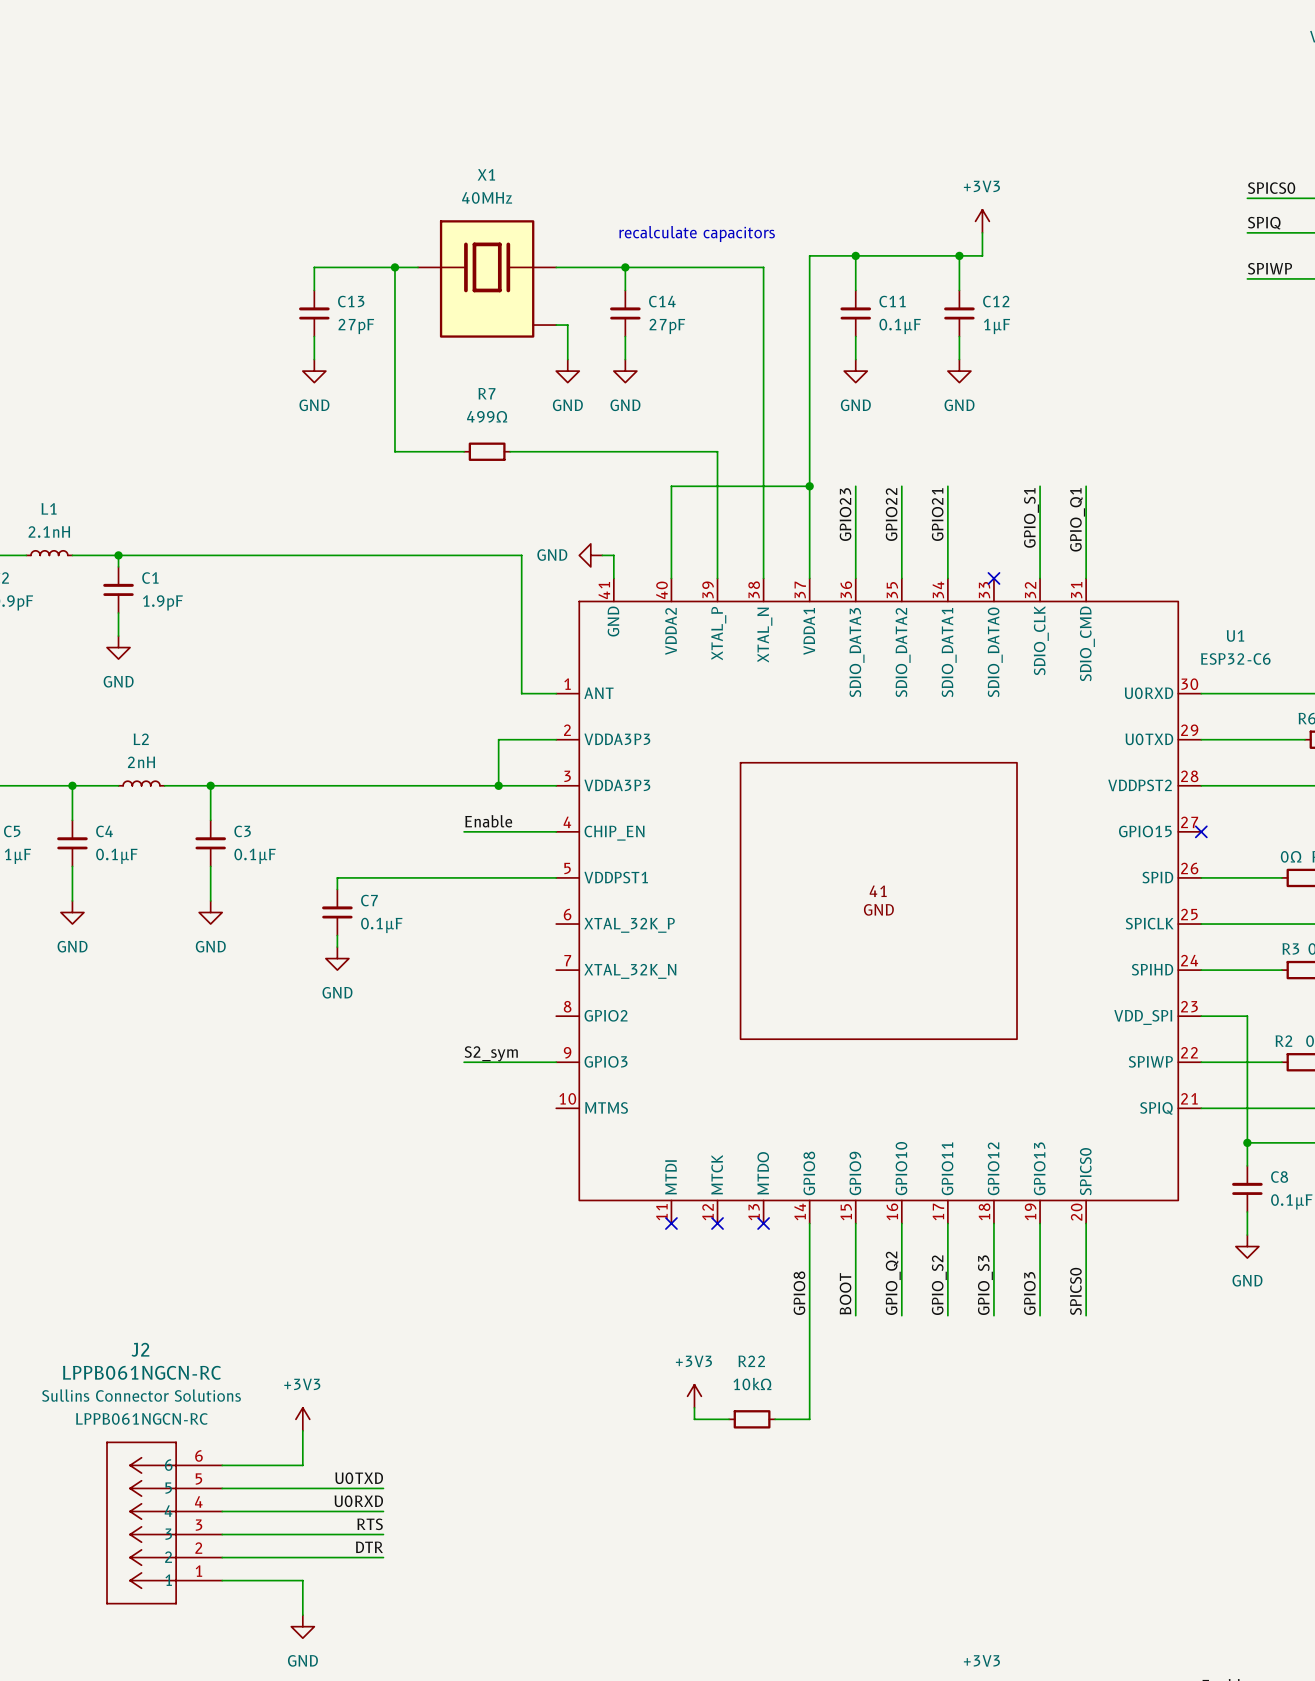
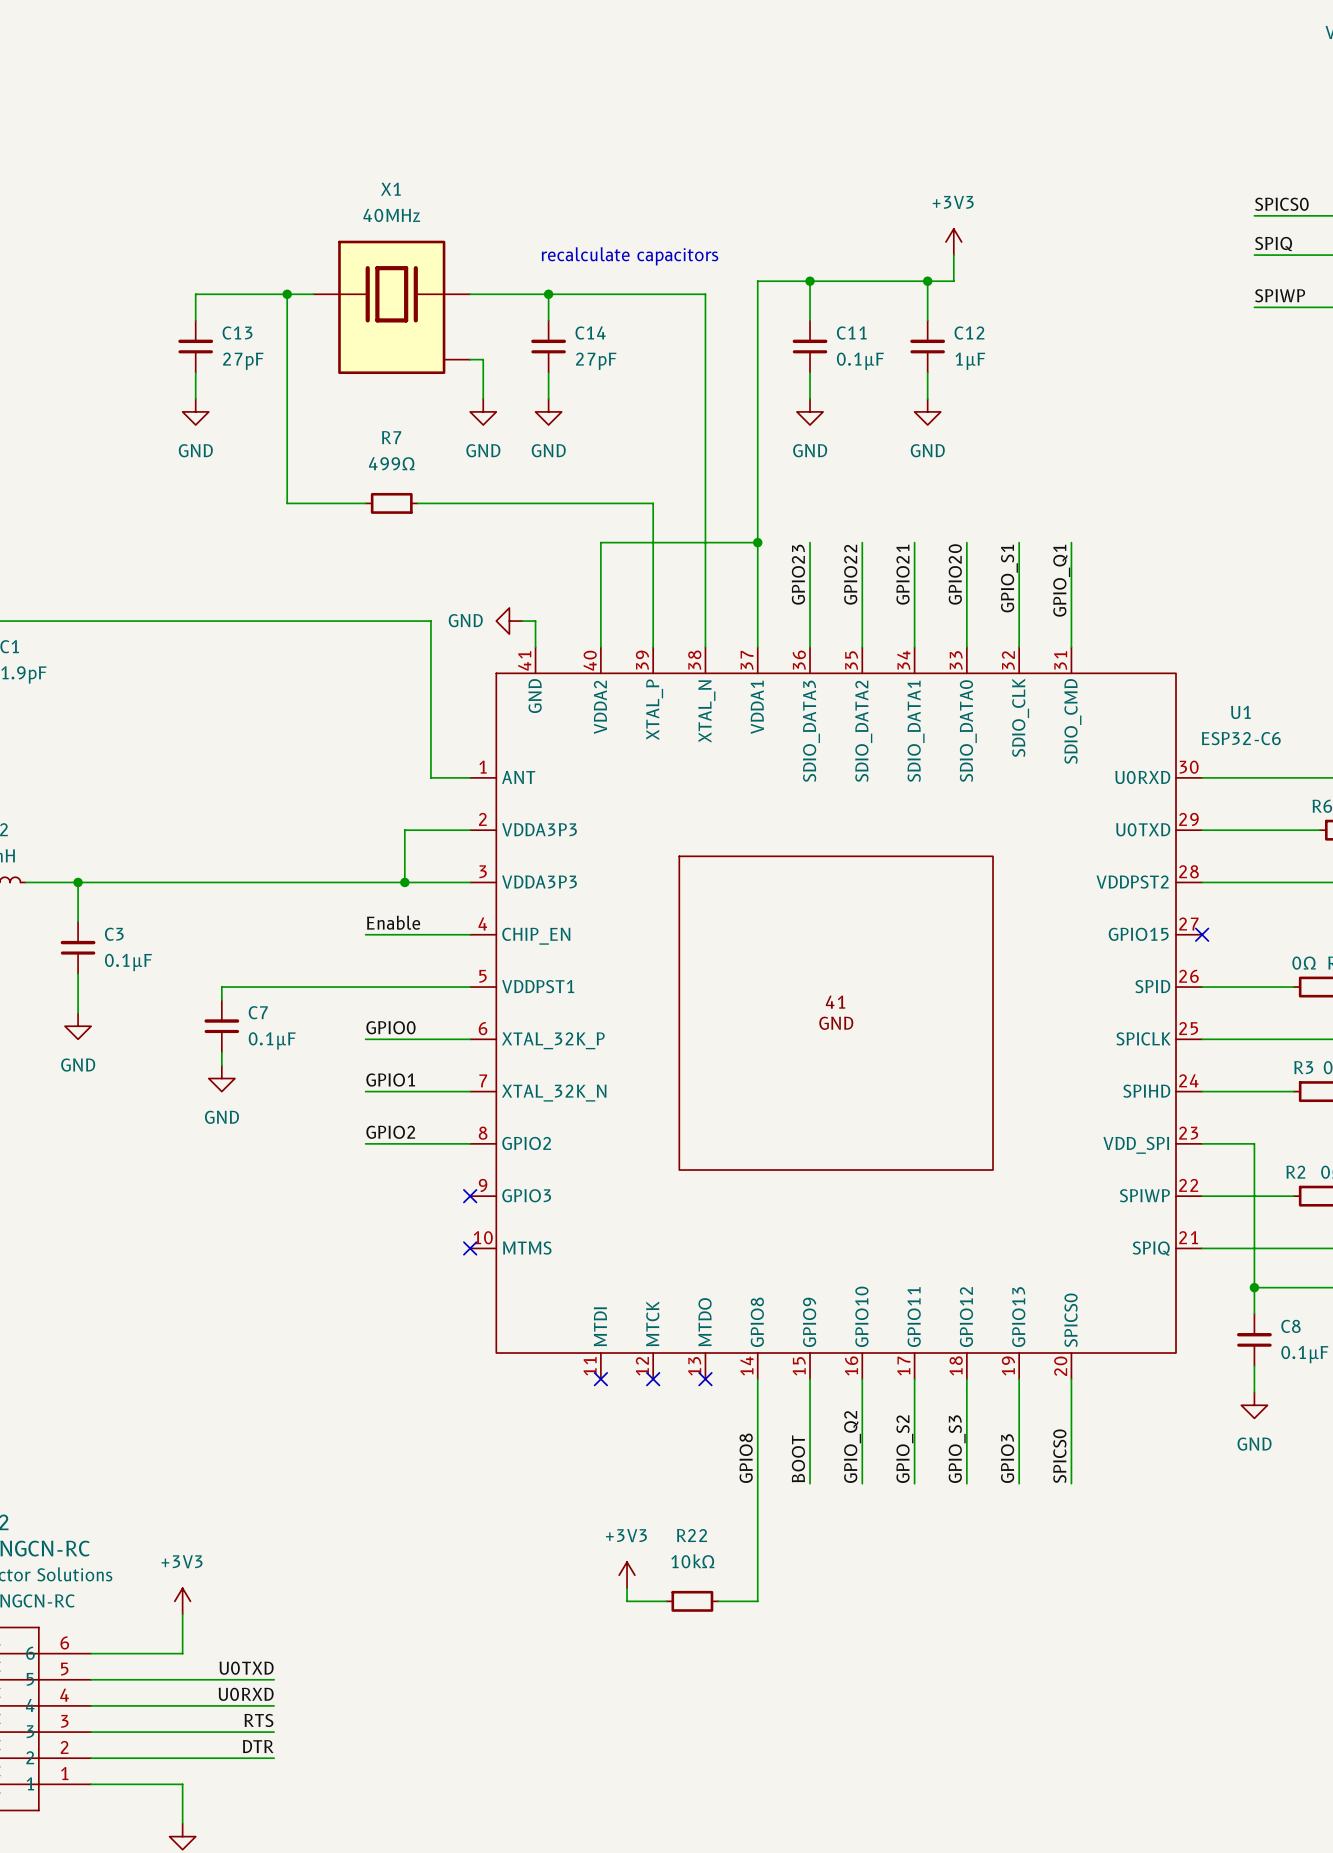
wire: none -> (966, 542) (966, 647)
label: none -> GPIO20 (955, 574)
no-connect mark: (993, 578) -> none
label: none -> GPIO0 (390, 1027)
wire: none -> (365, 1039) (470, 1039)
label: none -> GPIO1 (390, 1080)
wire: none -> (365, 1091) (470, 1091)
label: none -> GPIO2 (390, 1132)
label: S2_sym (491, 1053) -> none
wire: (464, 1062) (556, 1062) -> (365, 1143) (470, 1143)
no-connect mark: none -> (470, 1196)
no-connect mark: none -> (470, 1248)

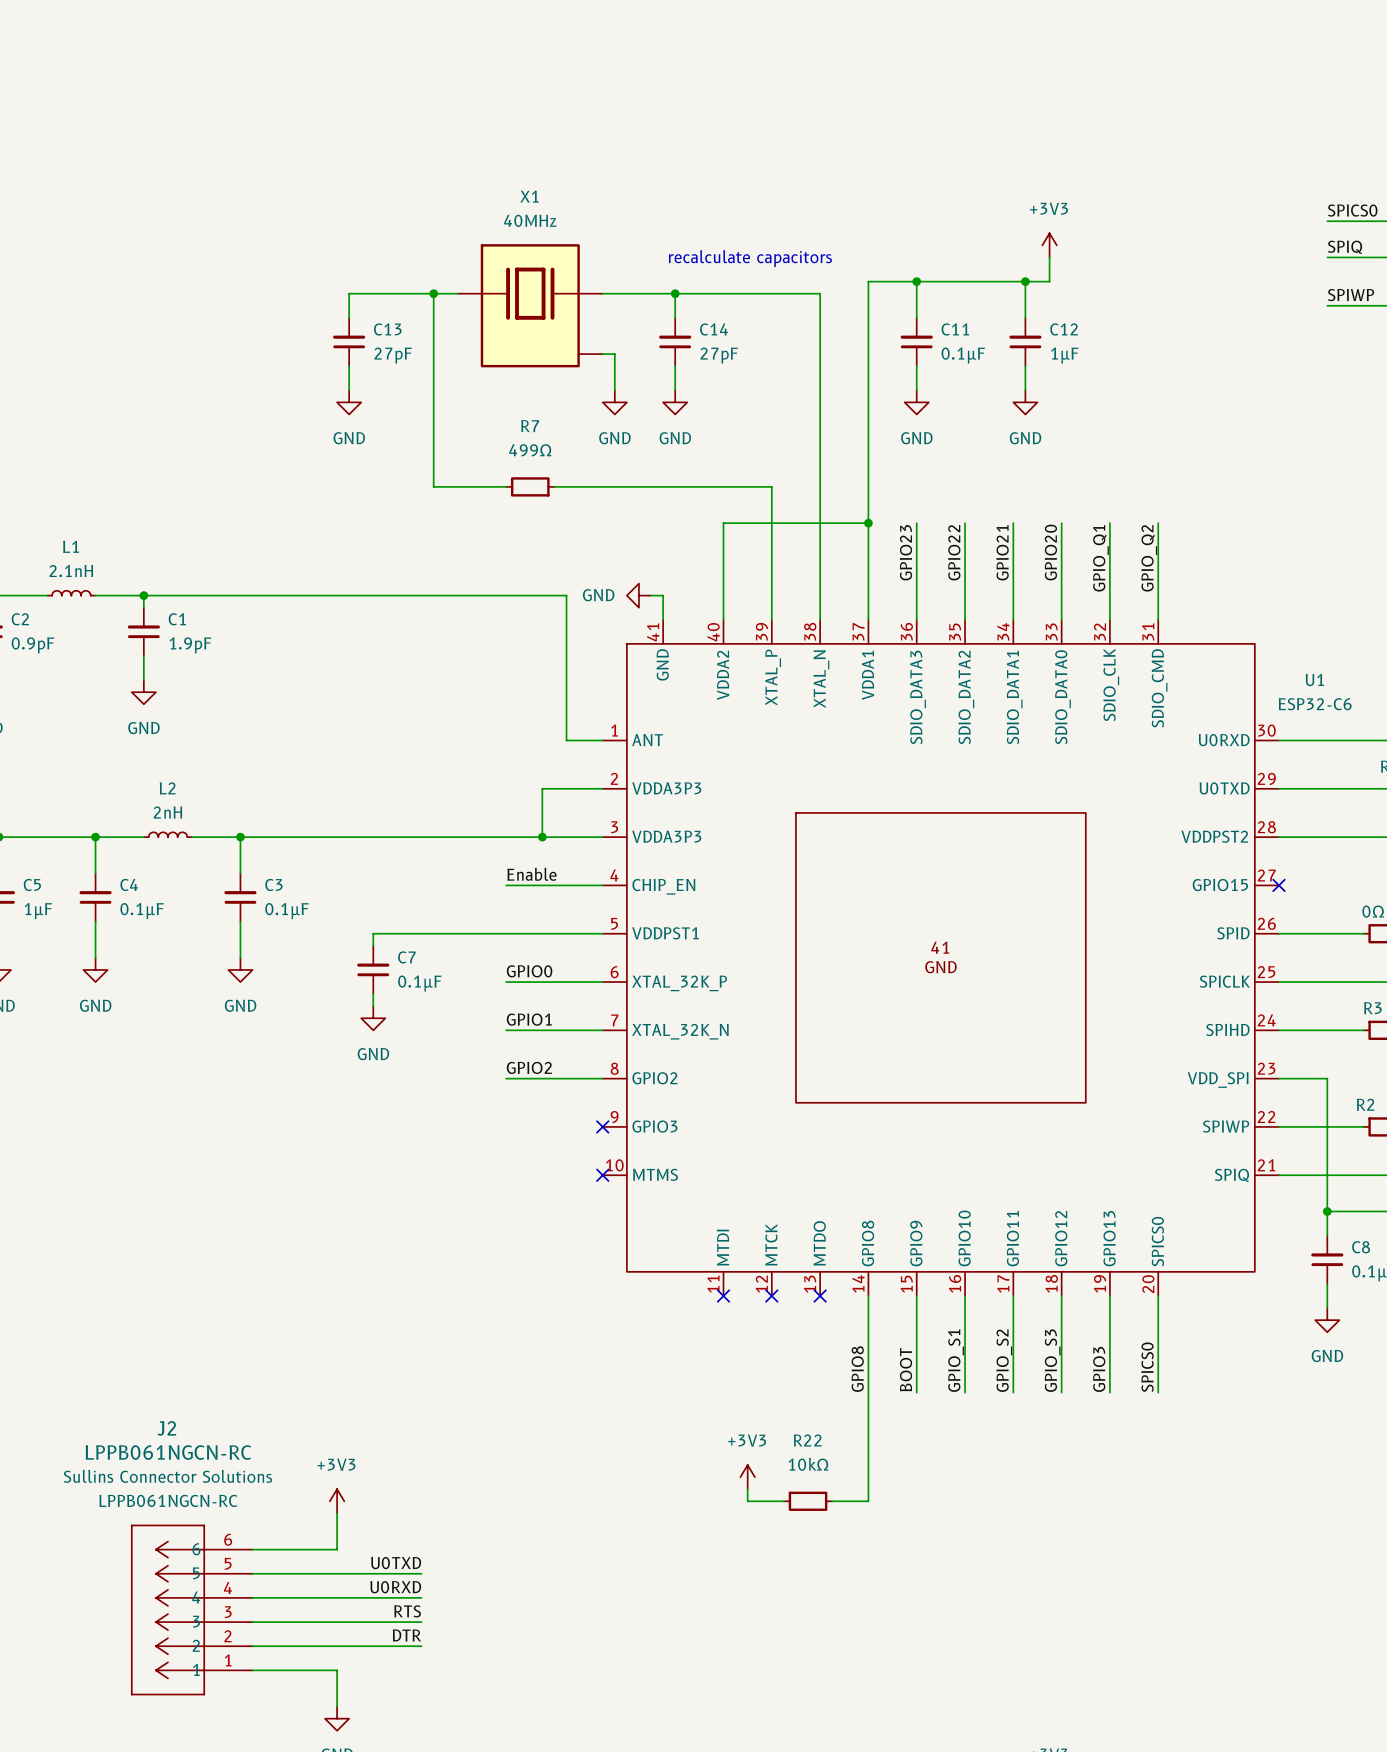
label: GPIO_S1 (1009, 578) -> GPIO_Q1 (1100, 558)
label: GPIO_Q1 (1061, 580) -> GPIO_Q2 (1149, 558)
label: GPIO_Q2 (852, 1446) -> GPIO_S1 (956, 1360)

